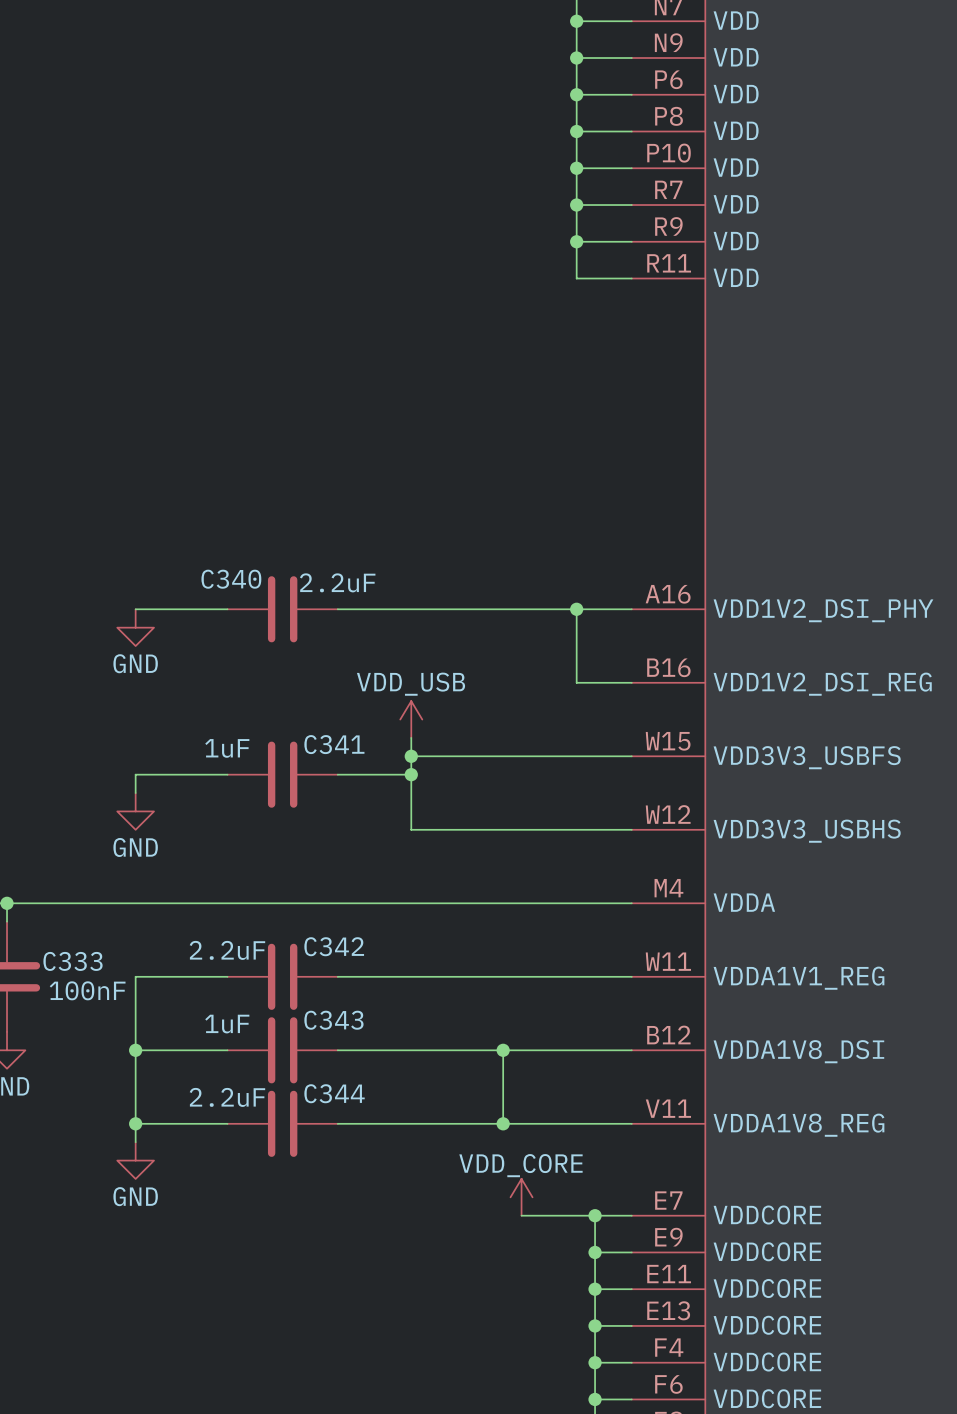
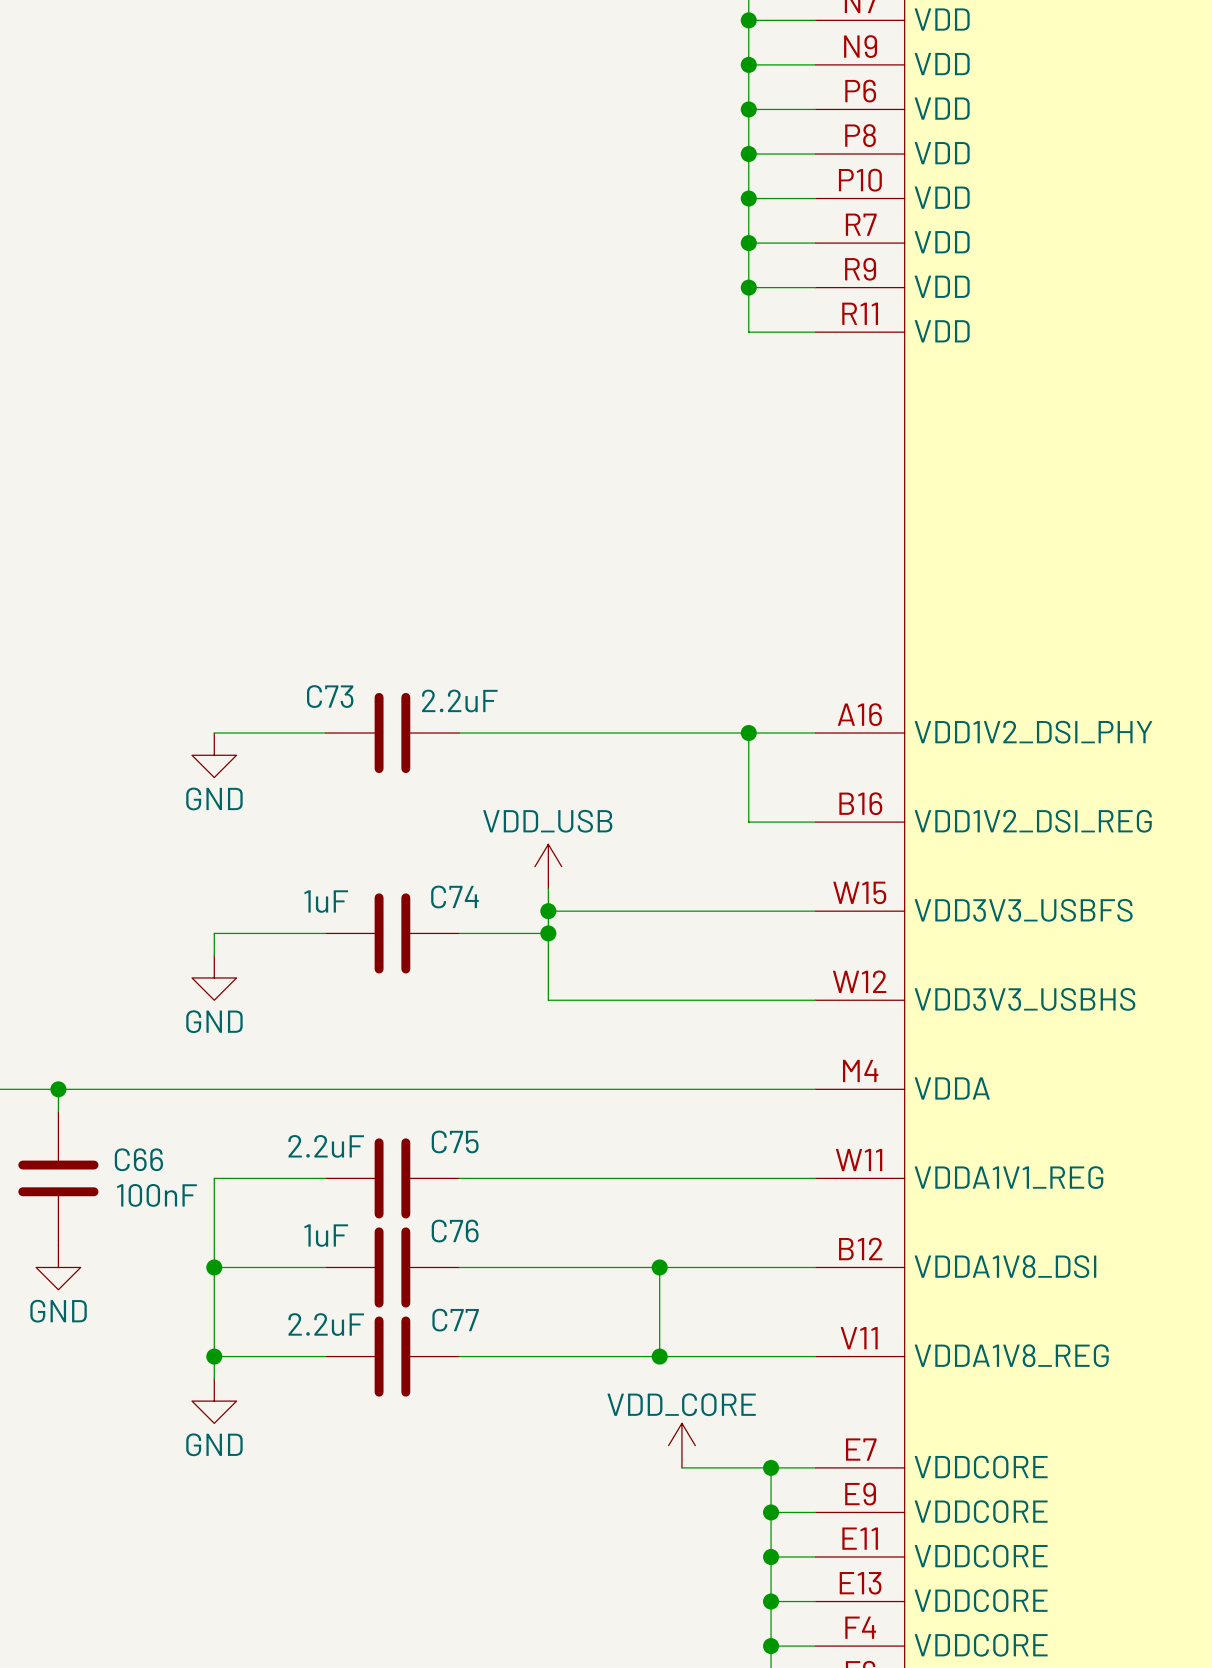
C340 name: C340 (231, 579) -> C73 (330, 696)
C341 name: C341 (334, 744) -> C74 (454, 896)
C342 name: C342 (334, 946) -> C75 (455, 1141)
C333 name: C333 (73, 961) -> C66 (138, 1159)
C343 name: C343 (333, 1020) -> C76 (455, 1231)
C344 name: C344 (334, 1093) -> C77 (455, 1320)

